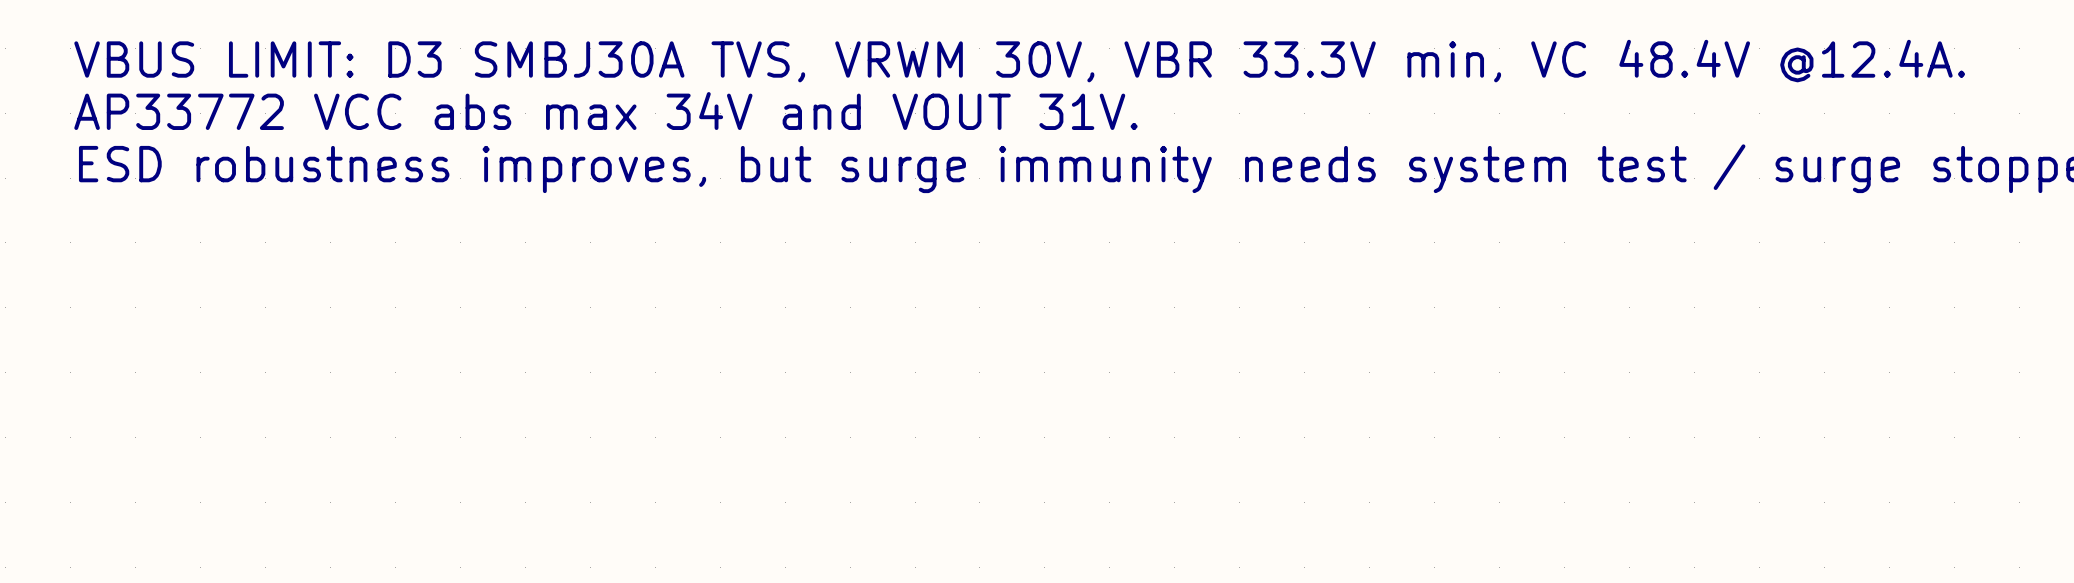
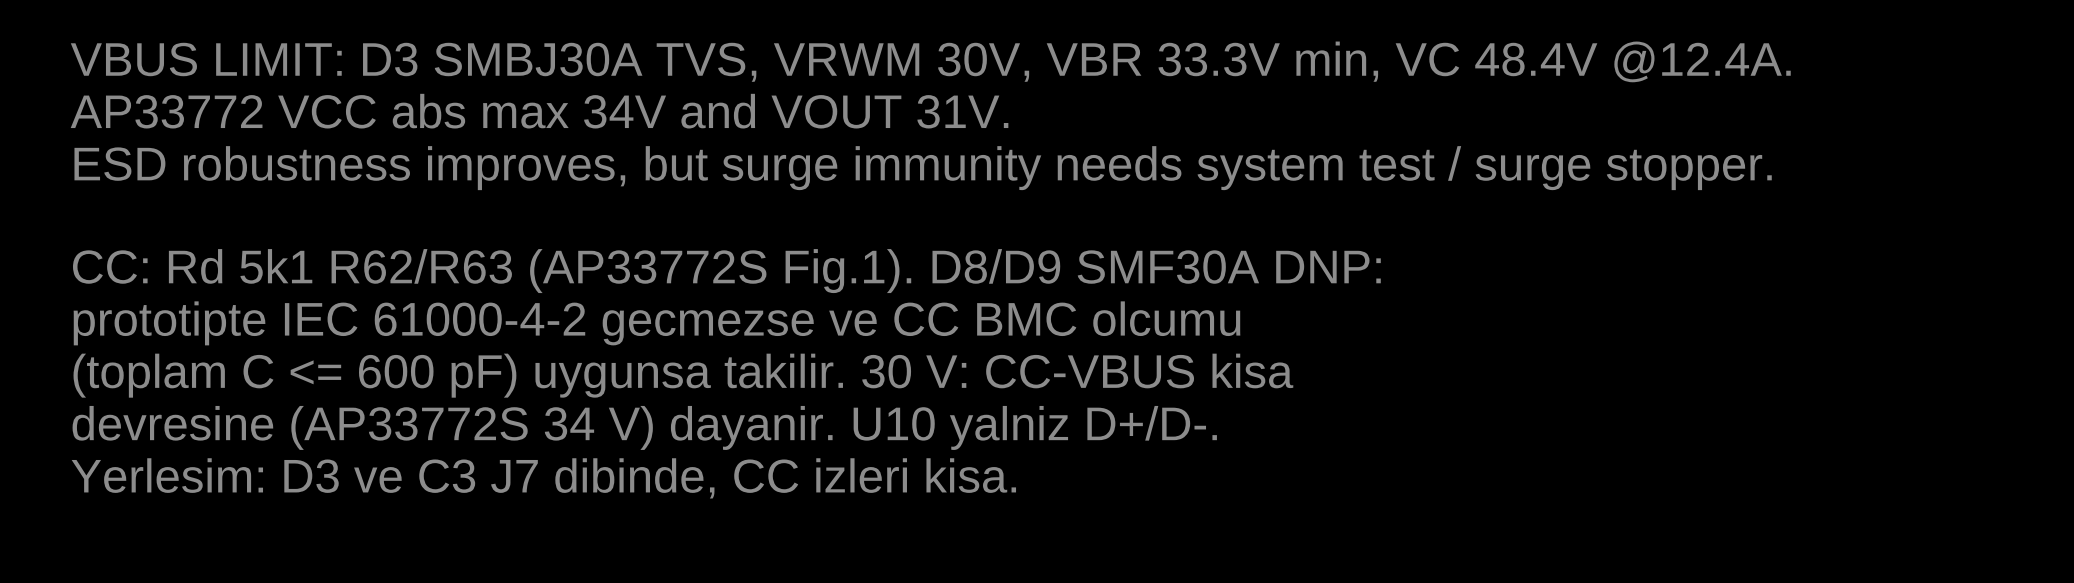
text: none -> CC: Rd 5k1 R62/R63 (AP33772S Fig.1). D8/D9 SMF30A DNP: (726, 271)
text: none -> prototipte IEC 61000-4-2 gecmezse ve CC BMC olcumu (656, 323)
text: none -> (toplam C <= 600 pF) uygunsa takilir. 30 V: CC-VBUS kisa (683, 375)
text: none -> devresine (AP33772S 34 V) dayanir. U10 yalniz D+/D-. (644, 427)
text: none -> Yerlesim: D3 ve C3 J7 dibinde, CC izleri kisa. (543, 478)

